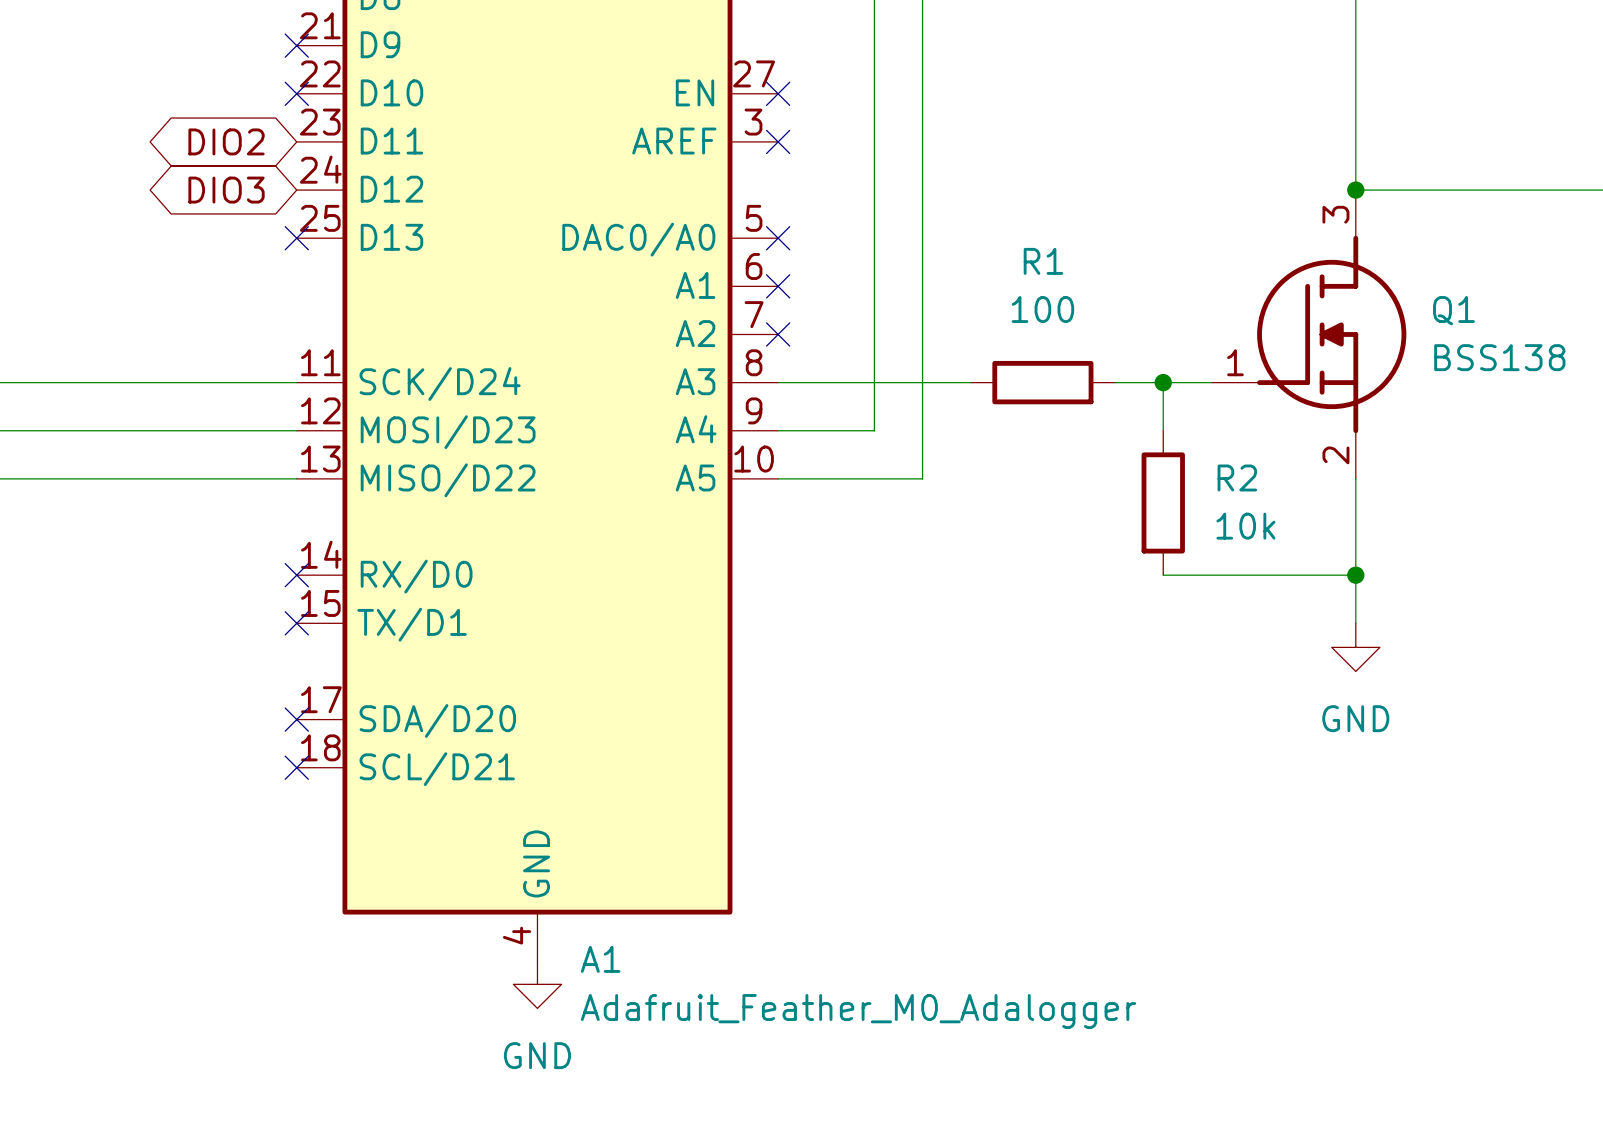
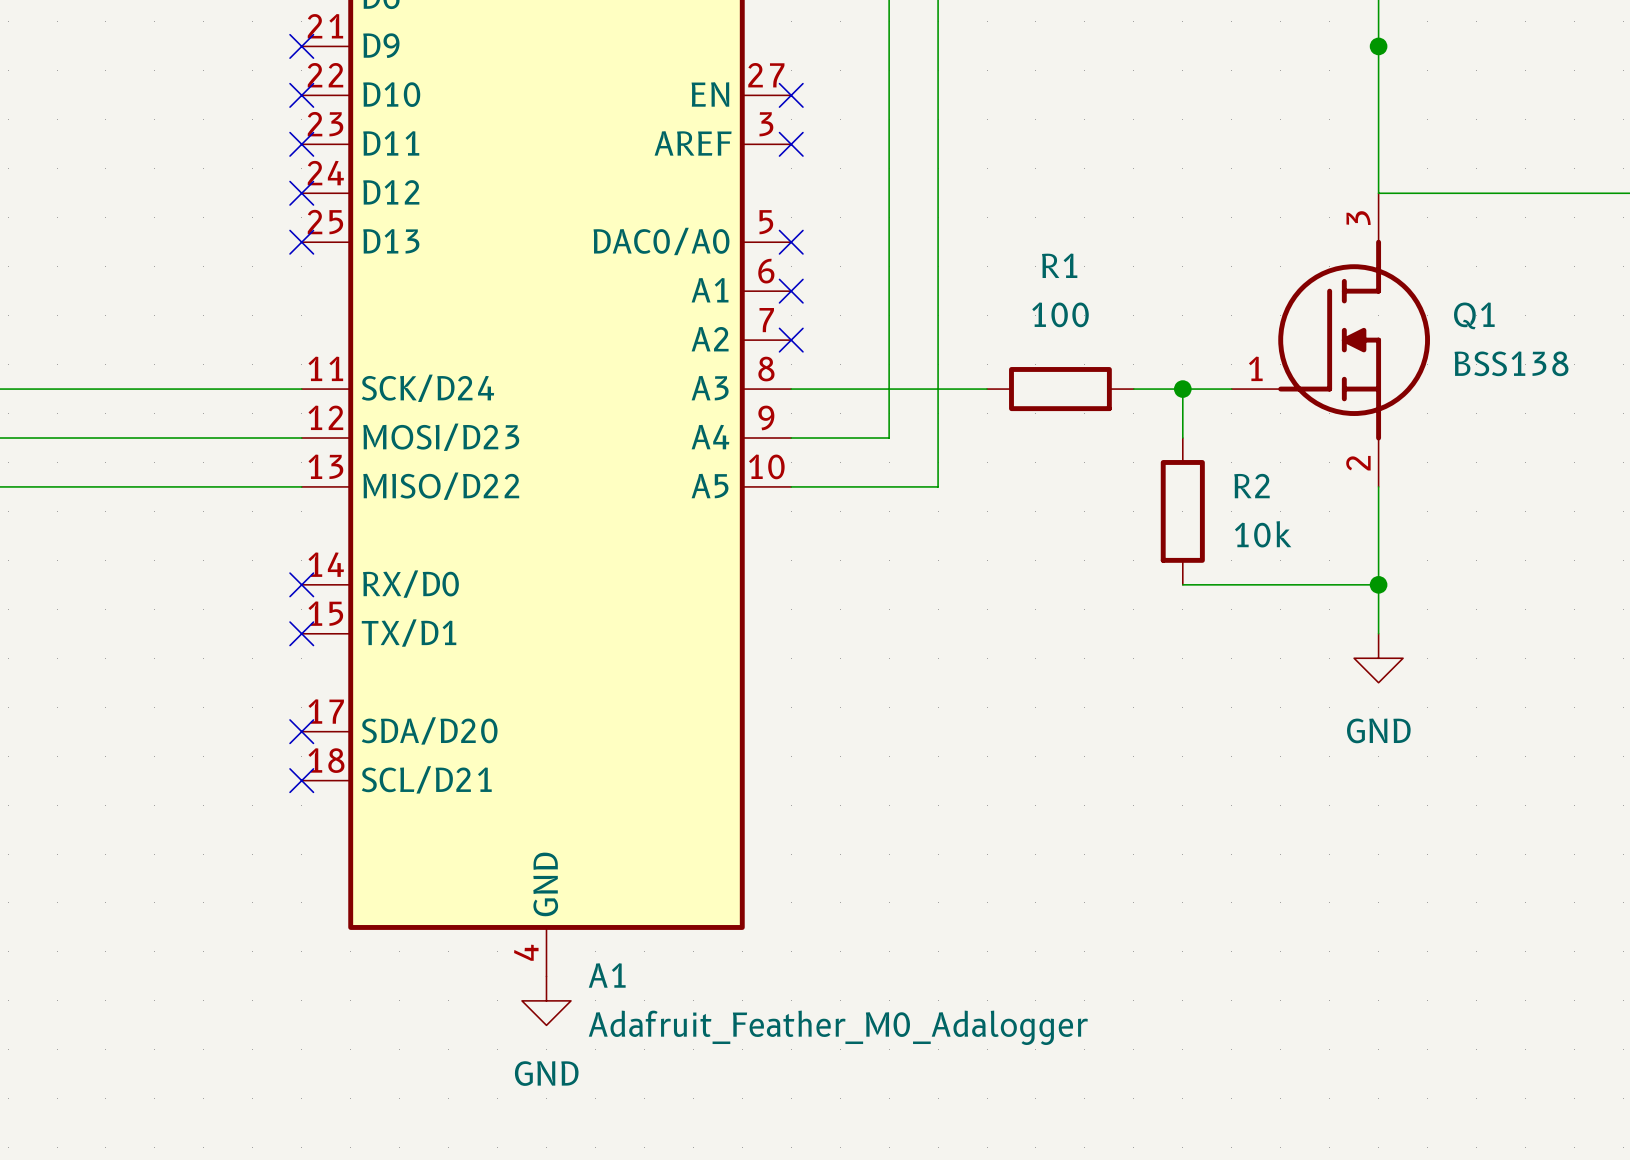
junction: none -> (1378, 46)
global label: DIO2 (226, 141) -> none
no-connect mark: none -> (301, 144)
global label: DIO3 (226, 190) -> none
no-connect mark: none -> (301, 193)
junction: (1355, 190) -> none

